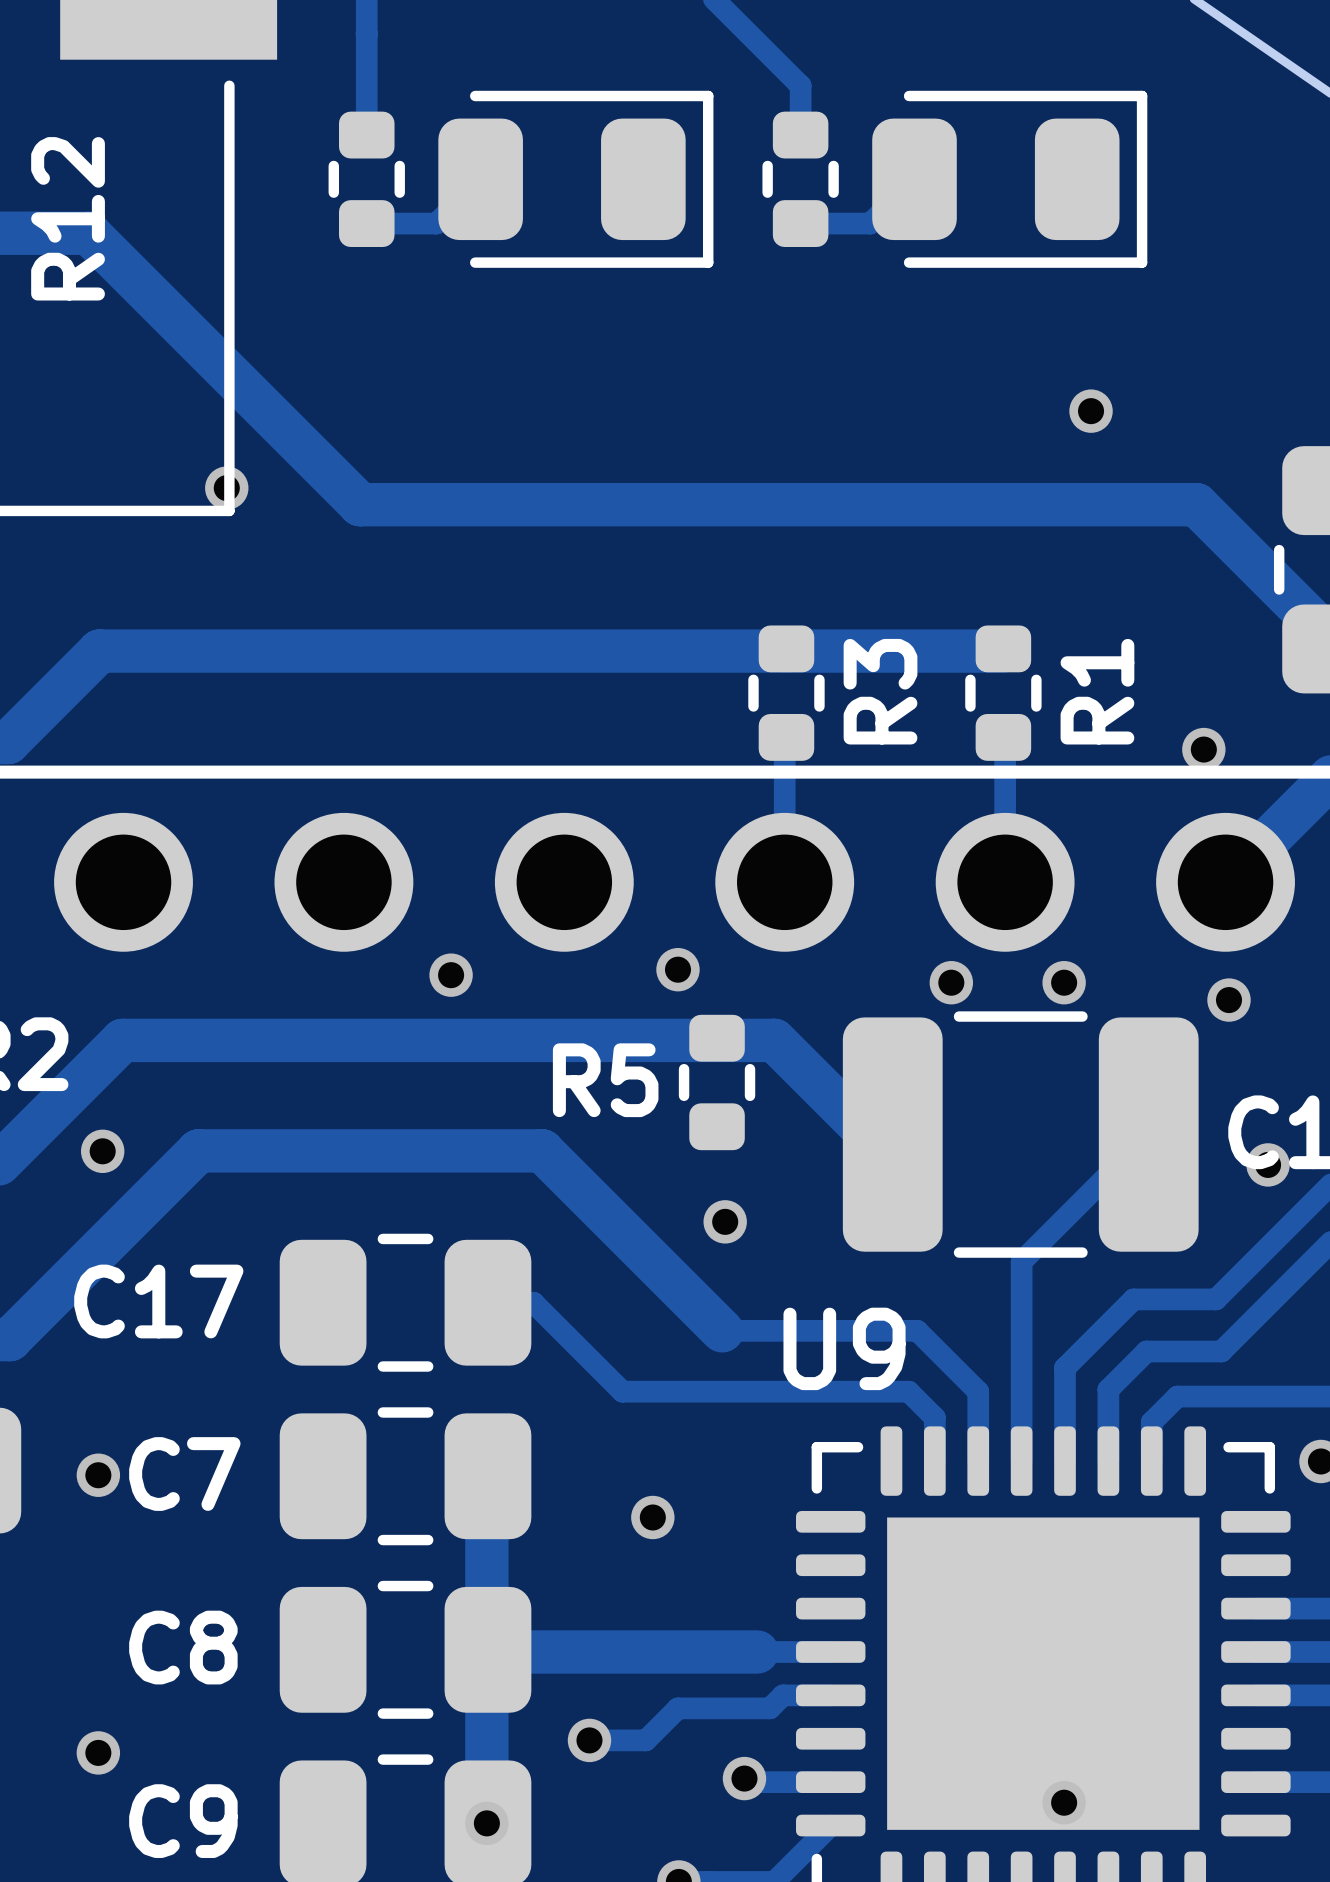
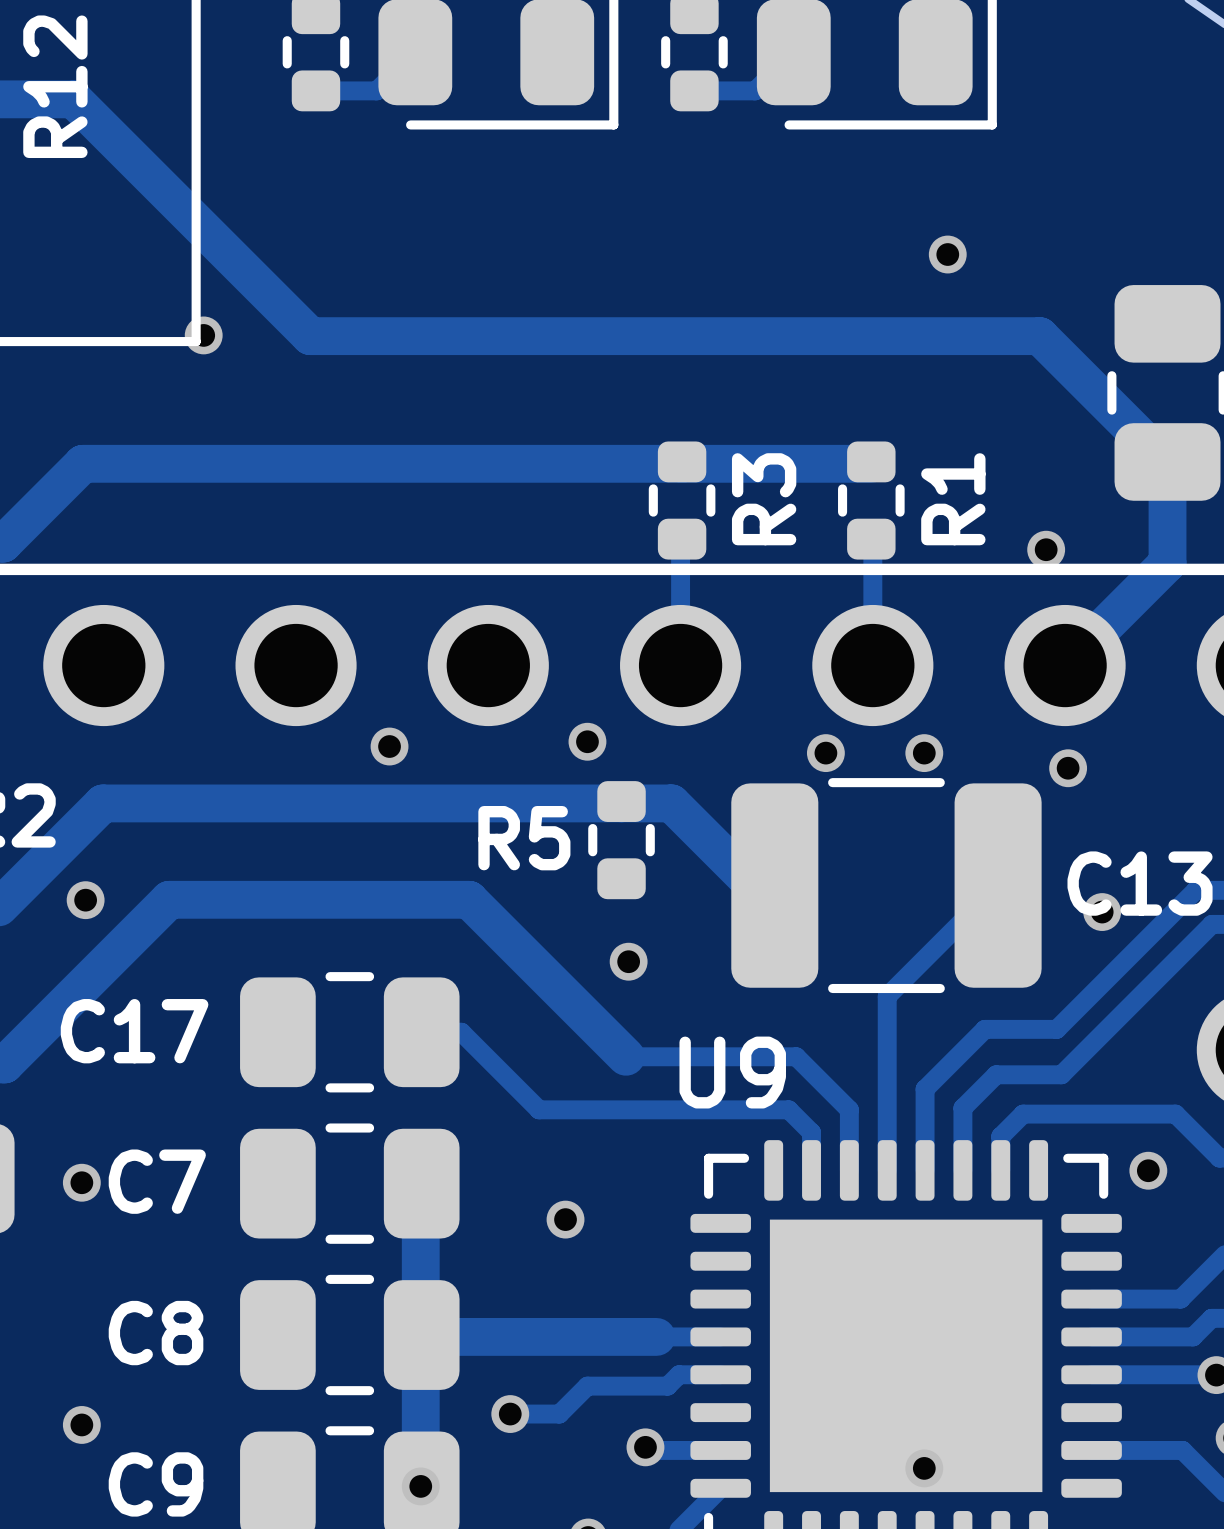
via position: (226, 488) -> (203, 335)

